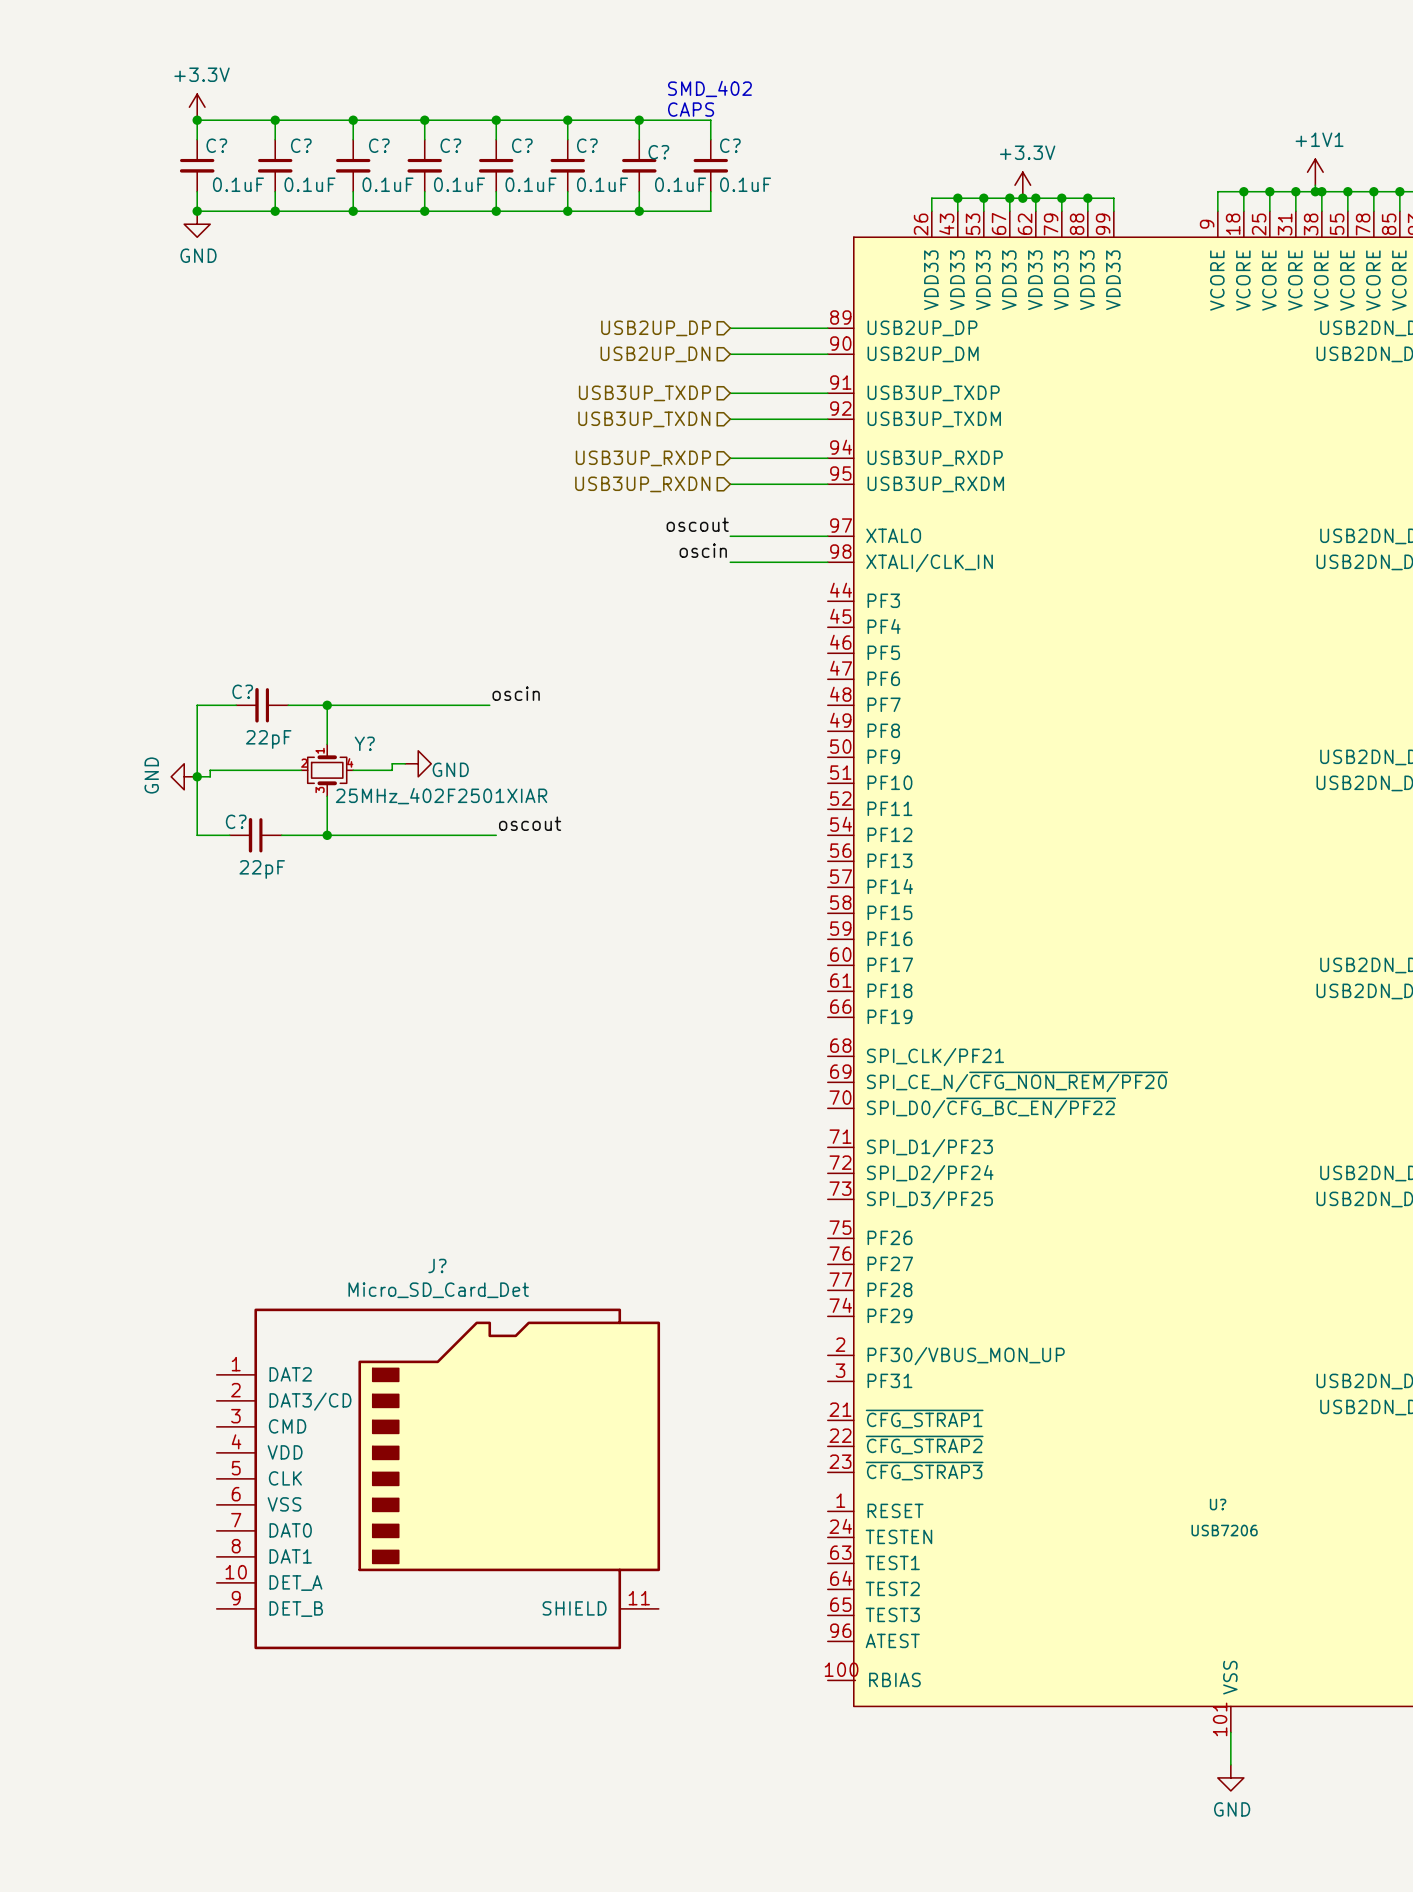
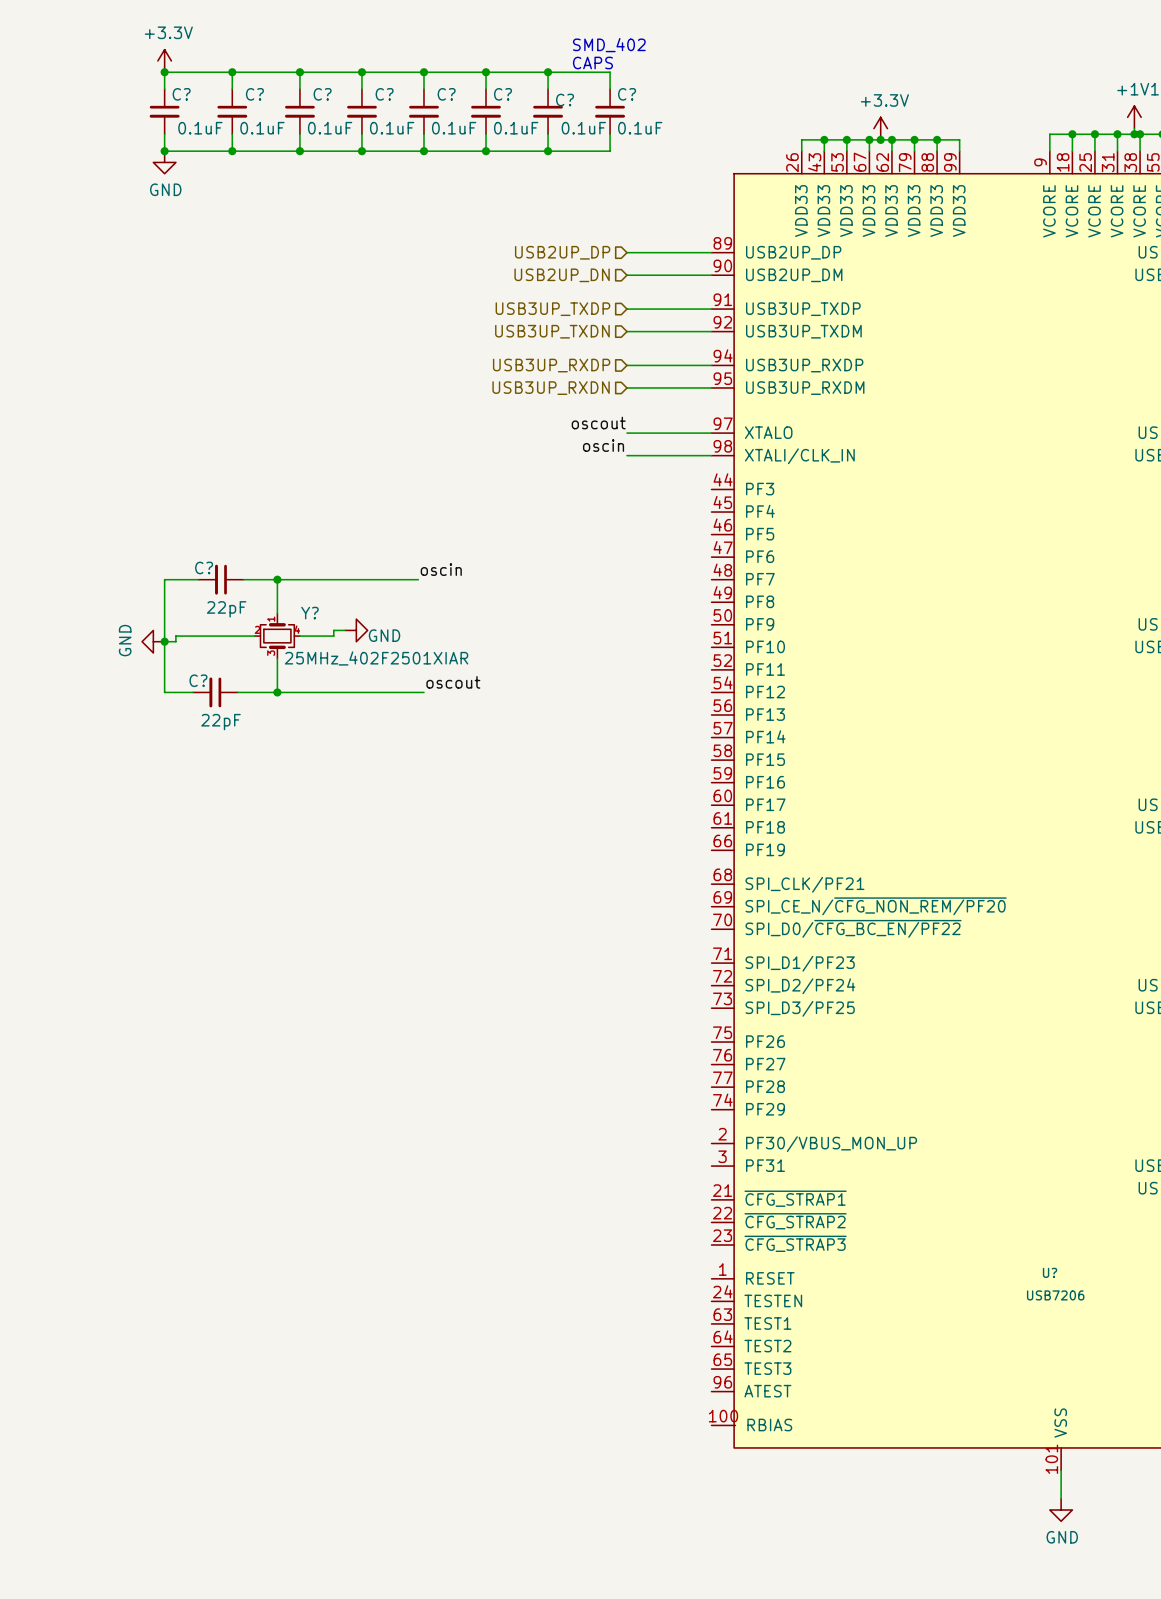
J?: Micro_SD_Card_Det (438, 1478) -> none

